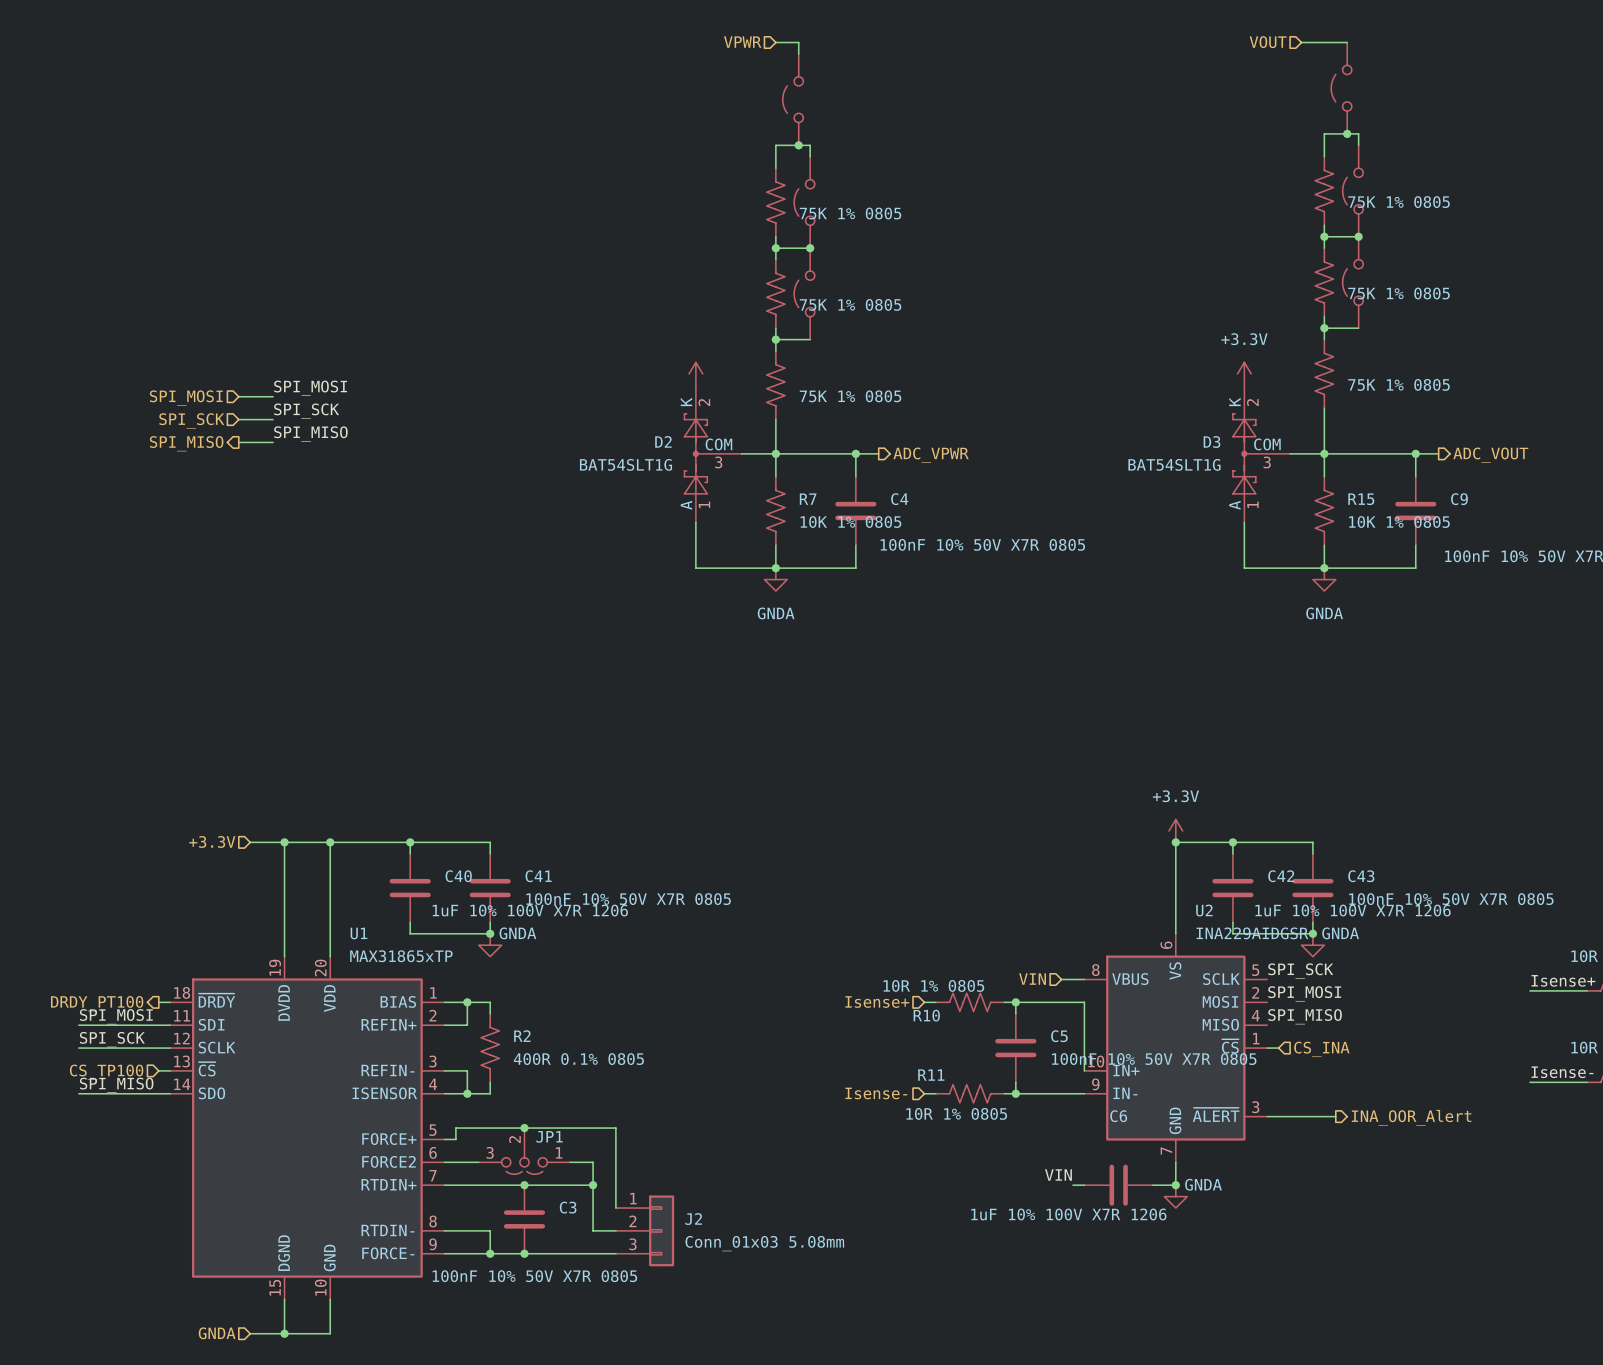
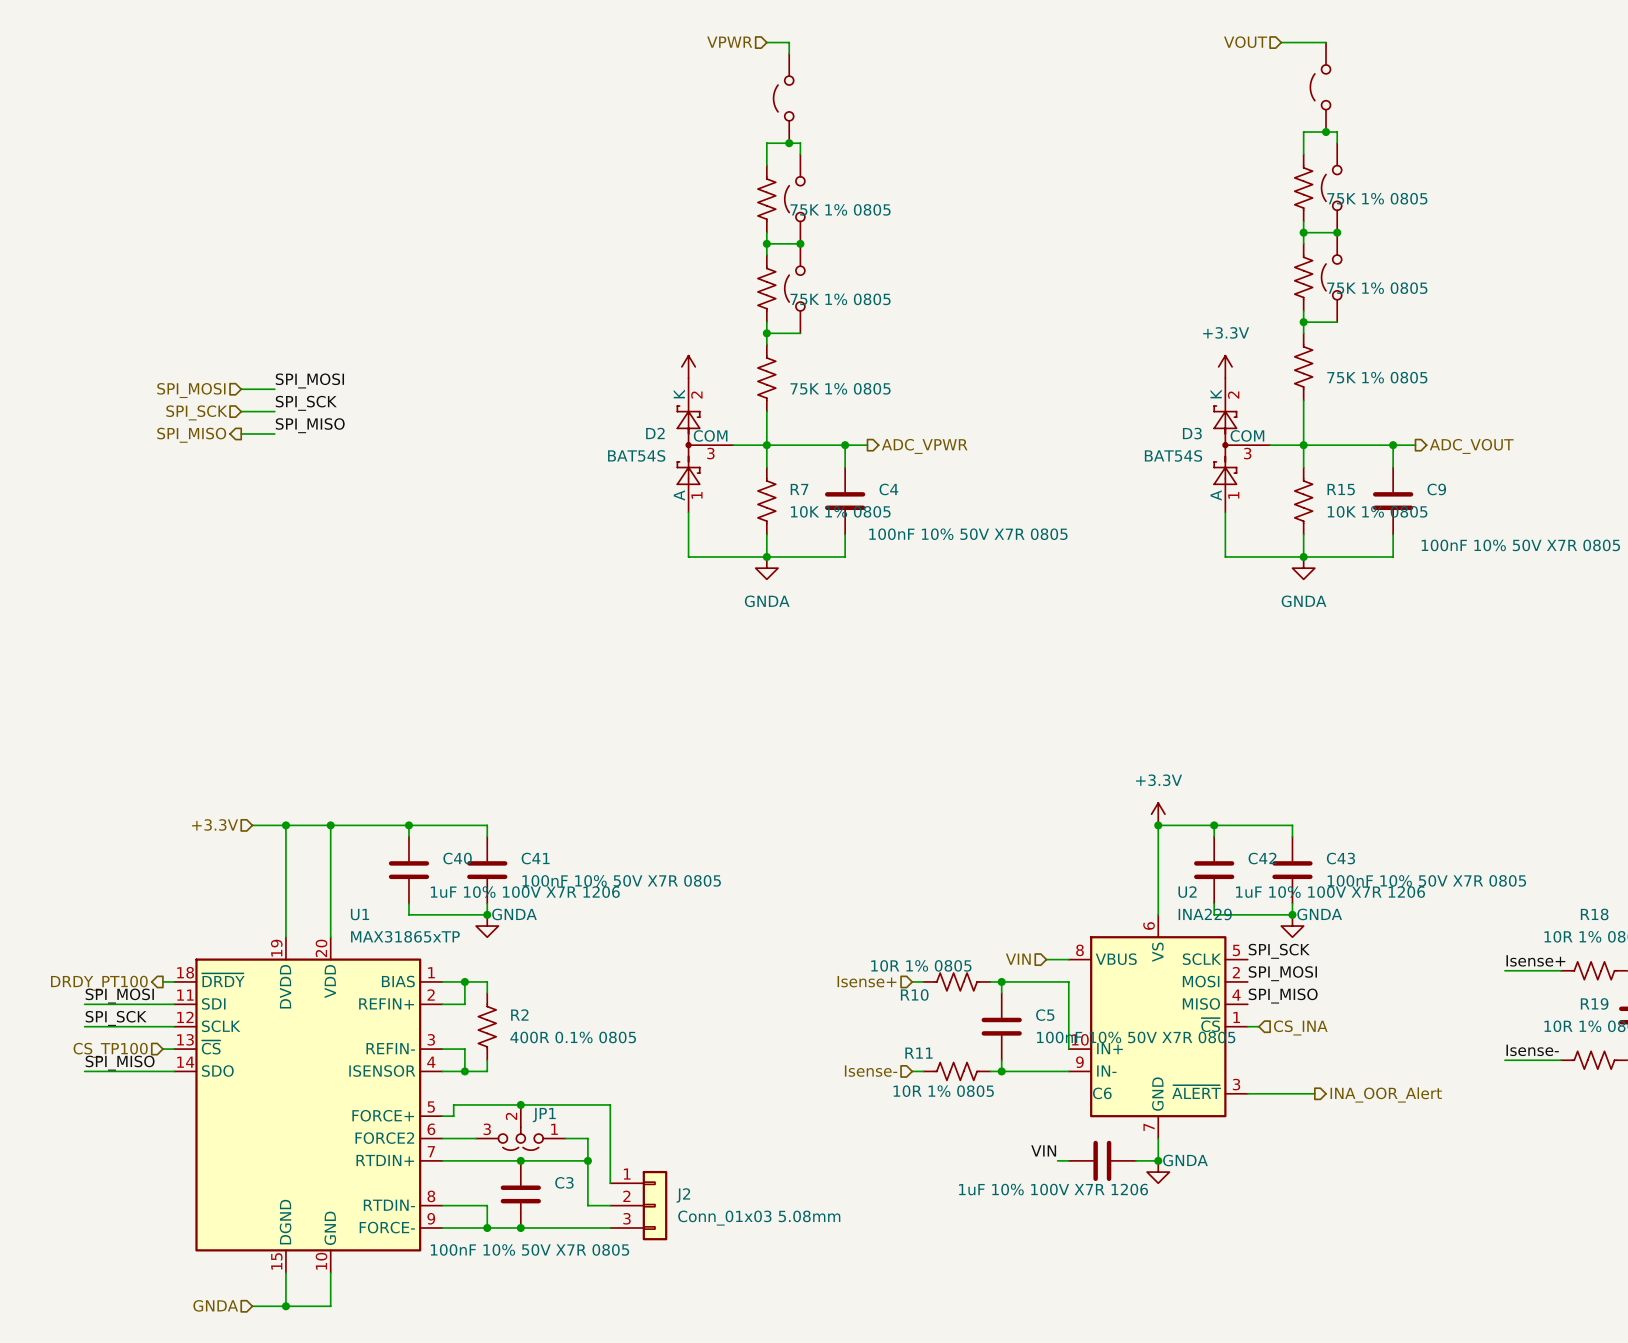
D2 value: BAT54SLT1G (625, 464) -> BAT54S (636, 455)
D3 value: BAT54SLT1G (1174, 464) -> BAT54S (1173, 455)
U2 value: INA229AIDGSR (1252, 933) -> INA229 (1205, 914)

